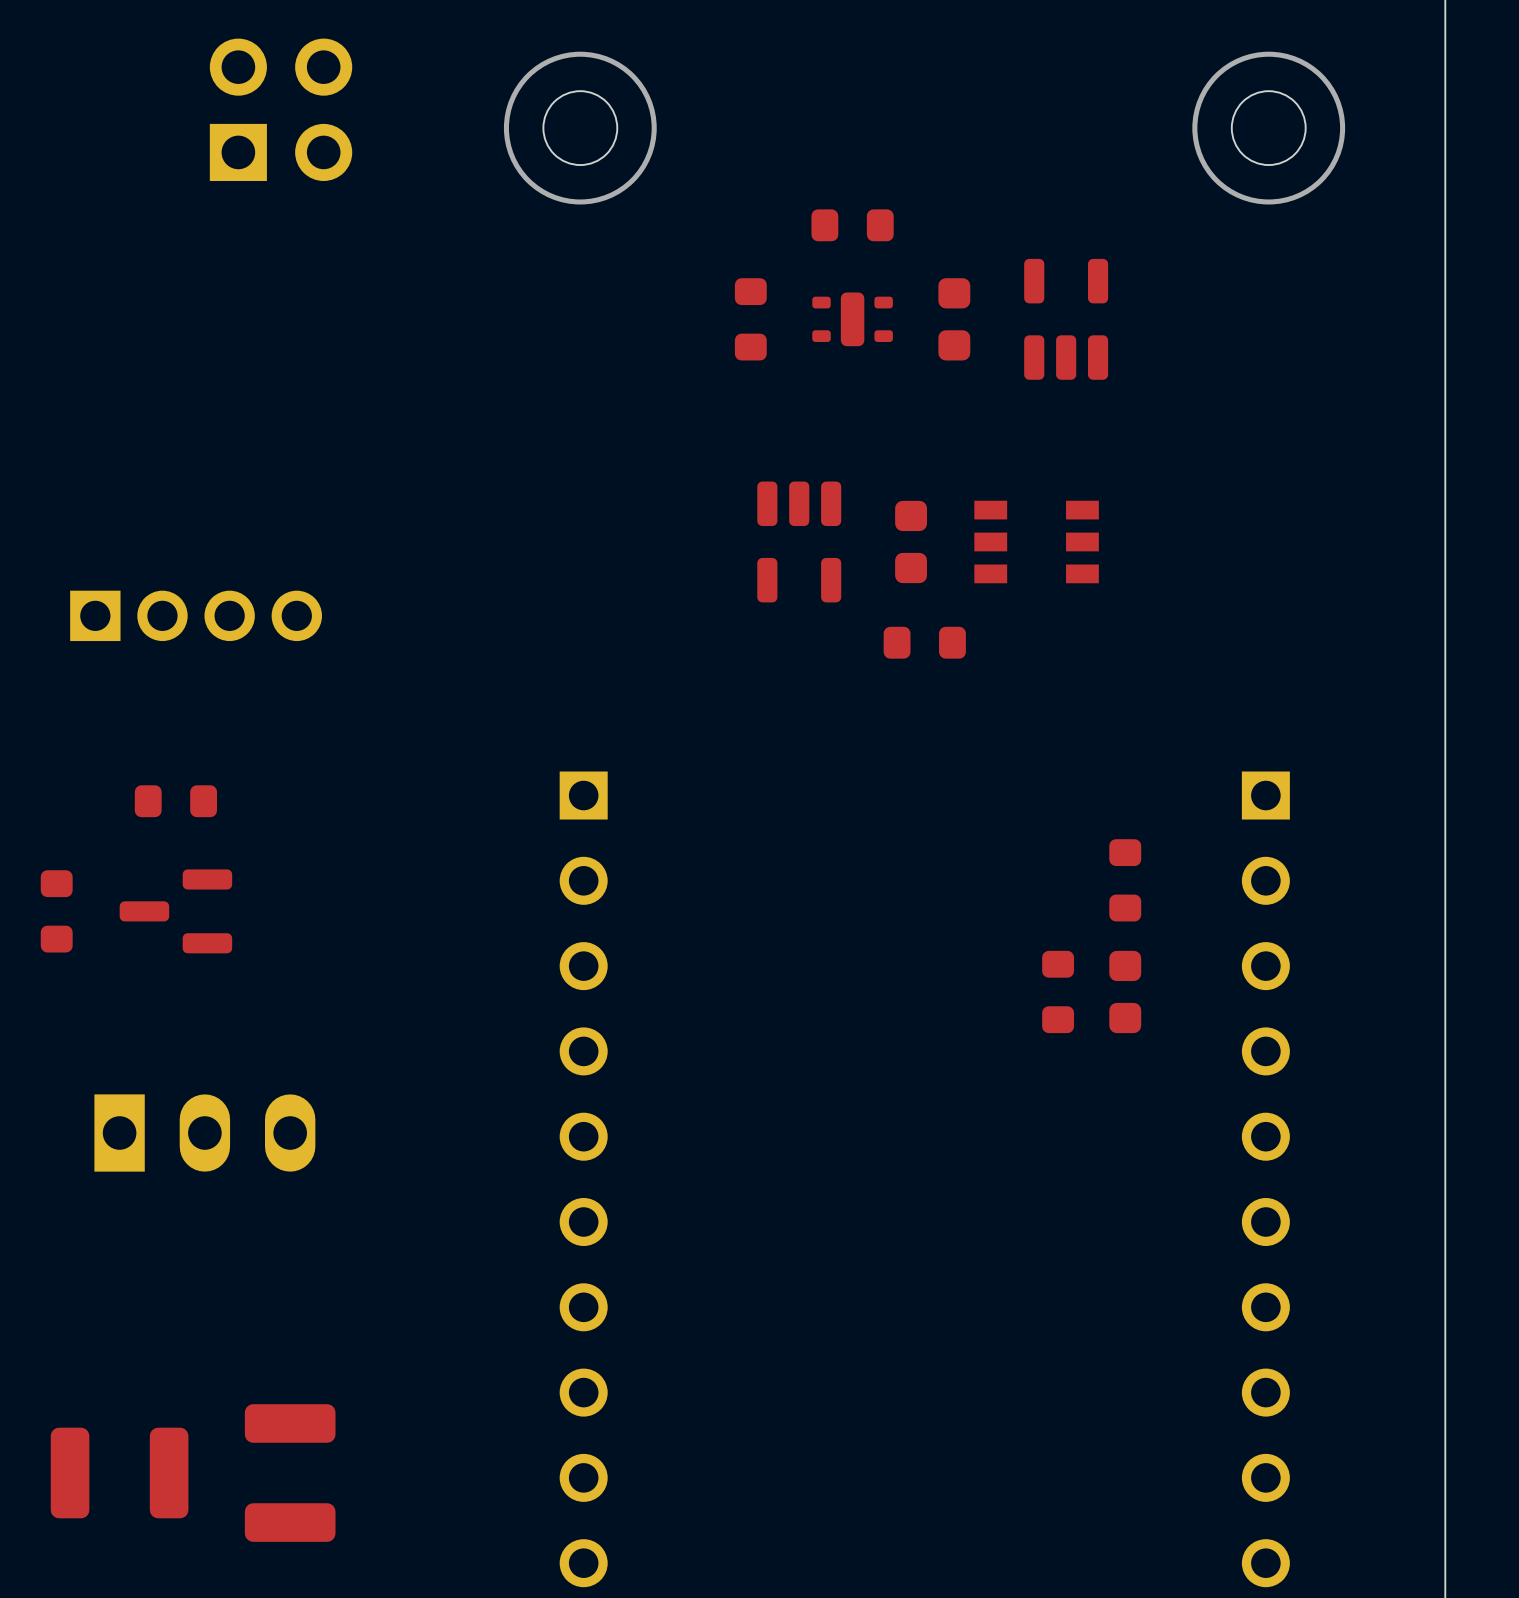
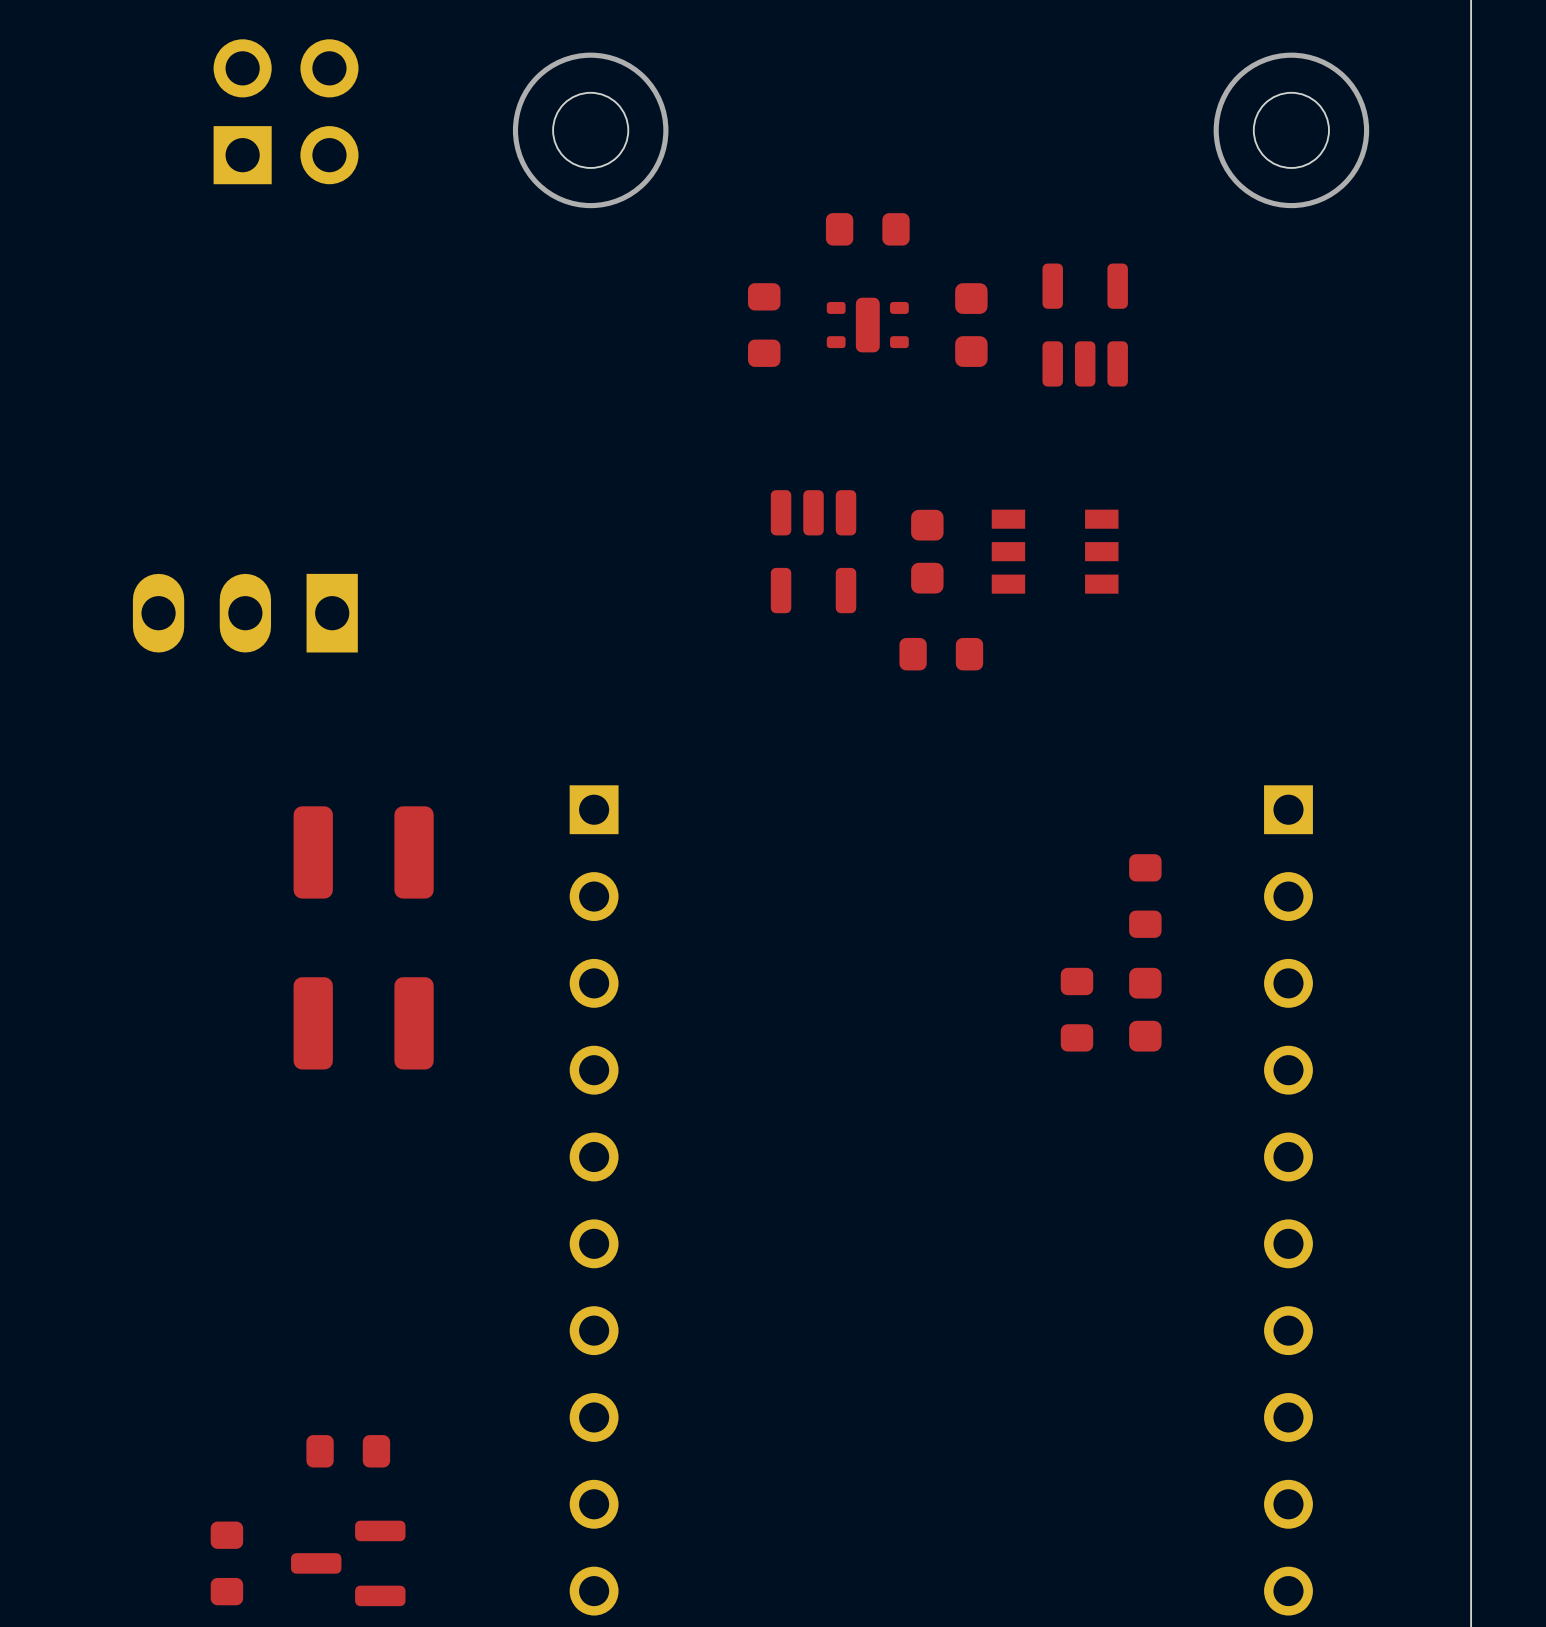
part: (196, 615) -> none
part: (175, 801) -> none
part: none -> (363, 852)
part: (56, 911) -> none
part position: (175, 911) -> (348, 1563)
part: none -> (363, 1023)
part rotation: 0° (204, 1133) -> 180° (245, 613)
part position: (204, 1133) -> (245, 613)
part: none -> (348, 1451)
part: (119, 1473) -> none
part: (290, 1473) -> none
part: none -> (226, 1563)

